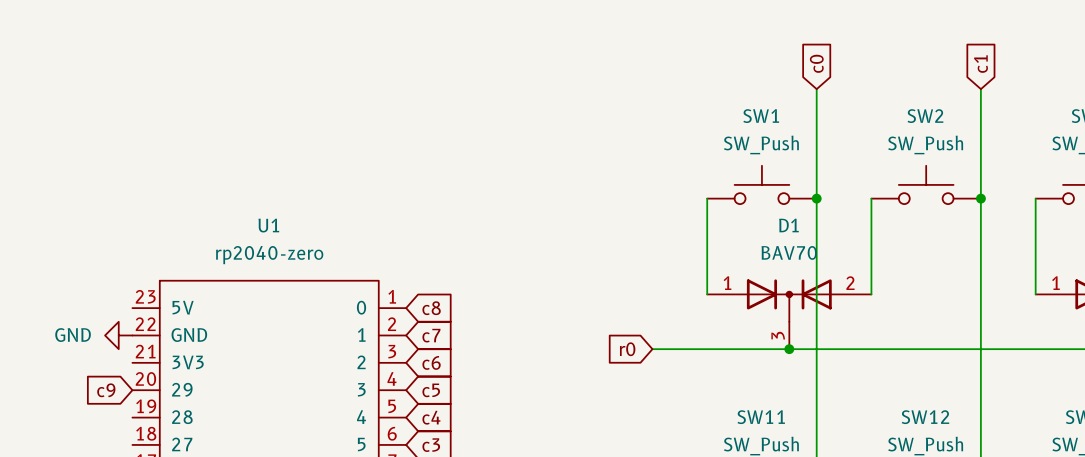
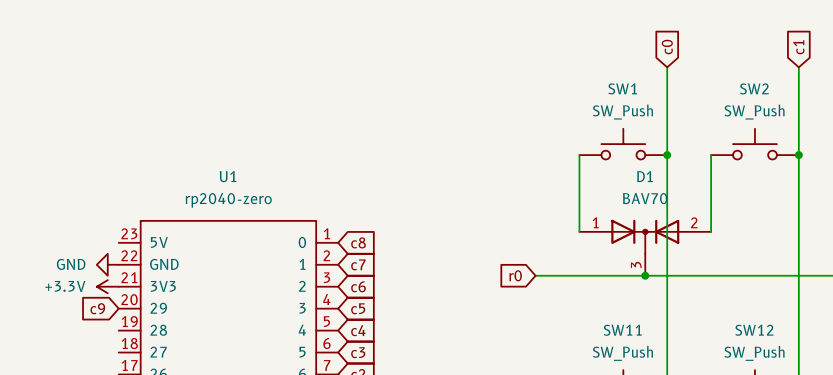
power symbol: none -> +3.3V (107, 286)

